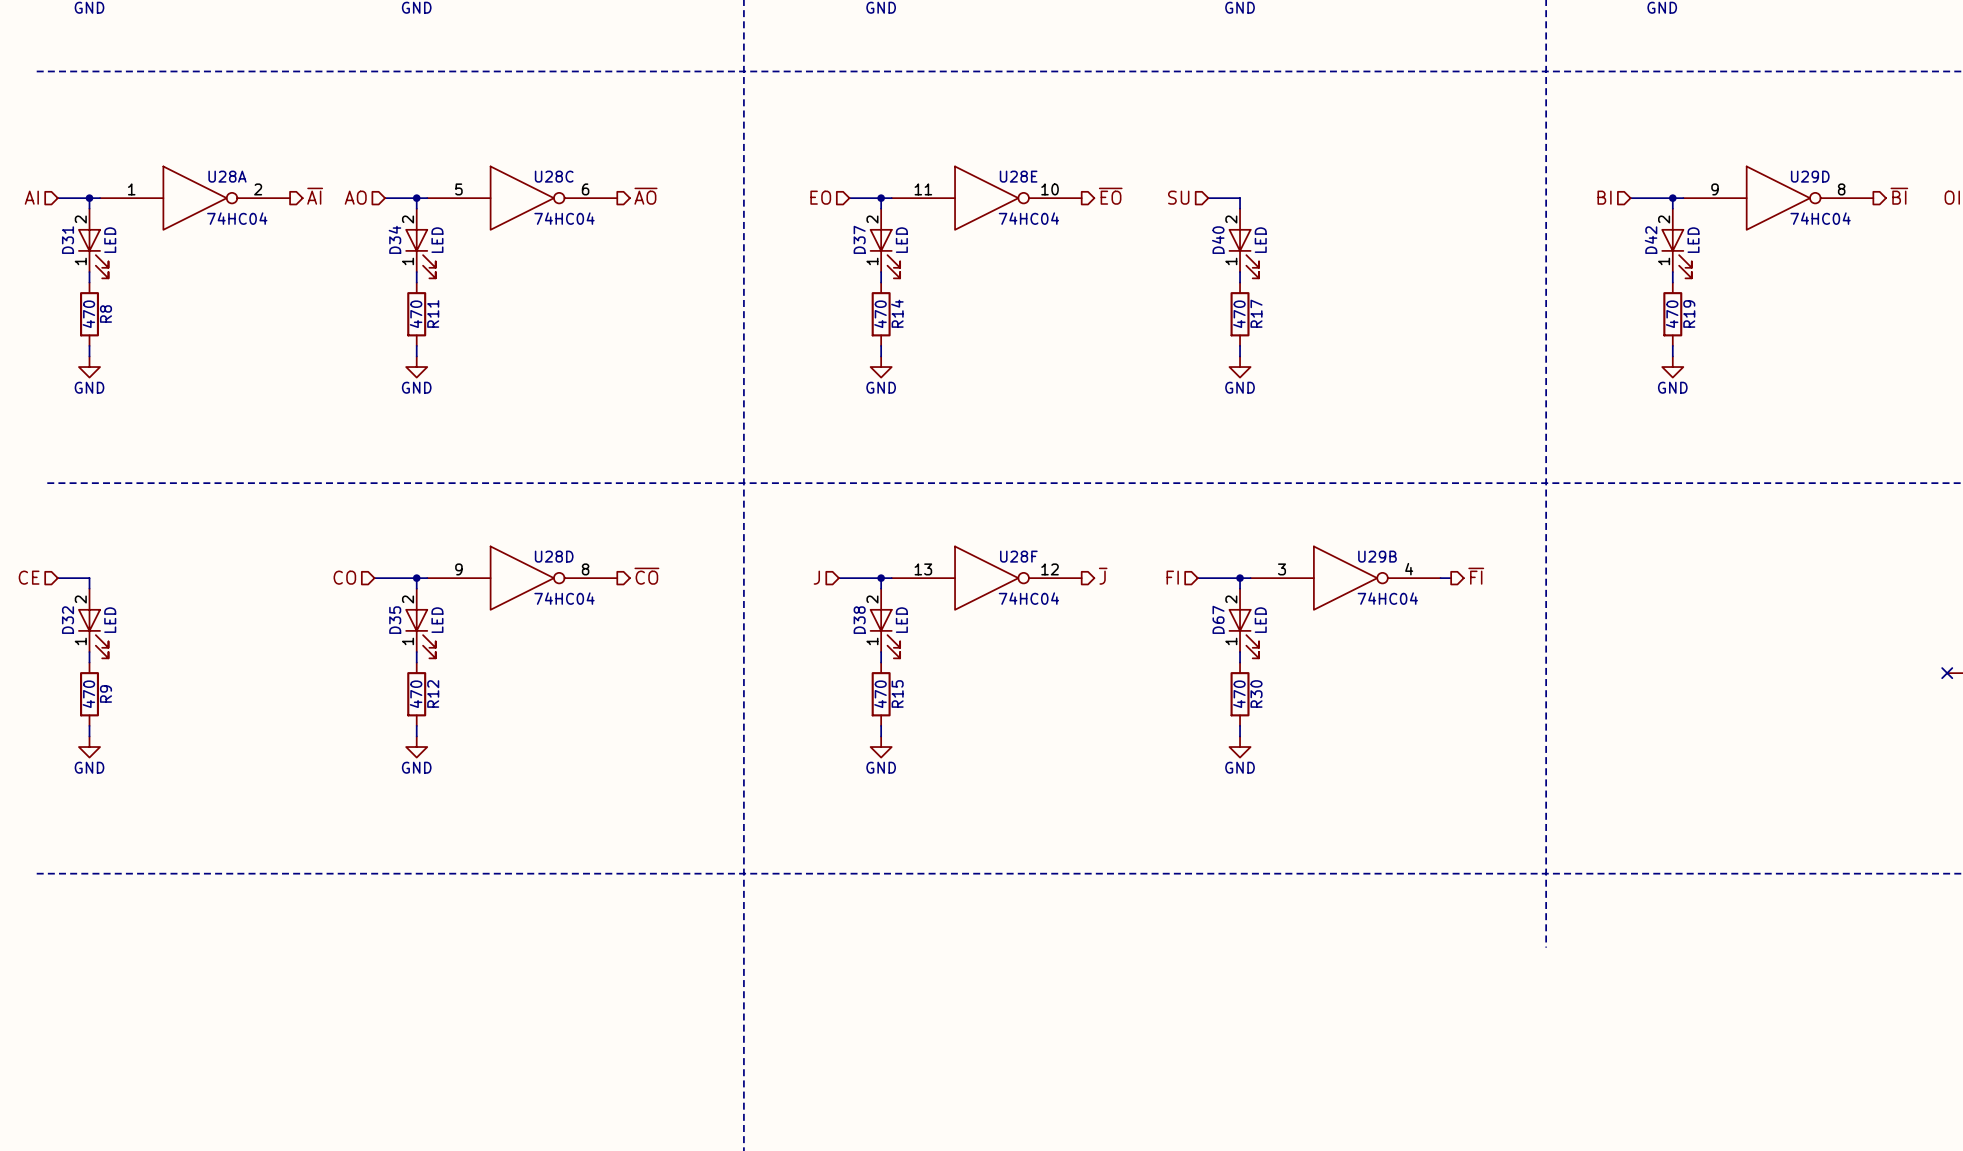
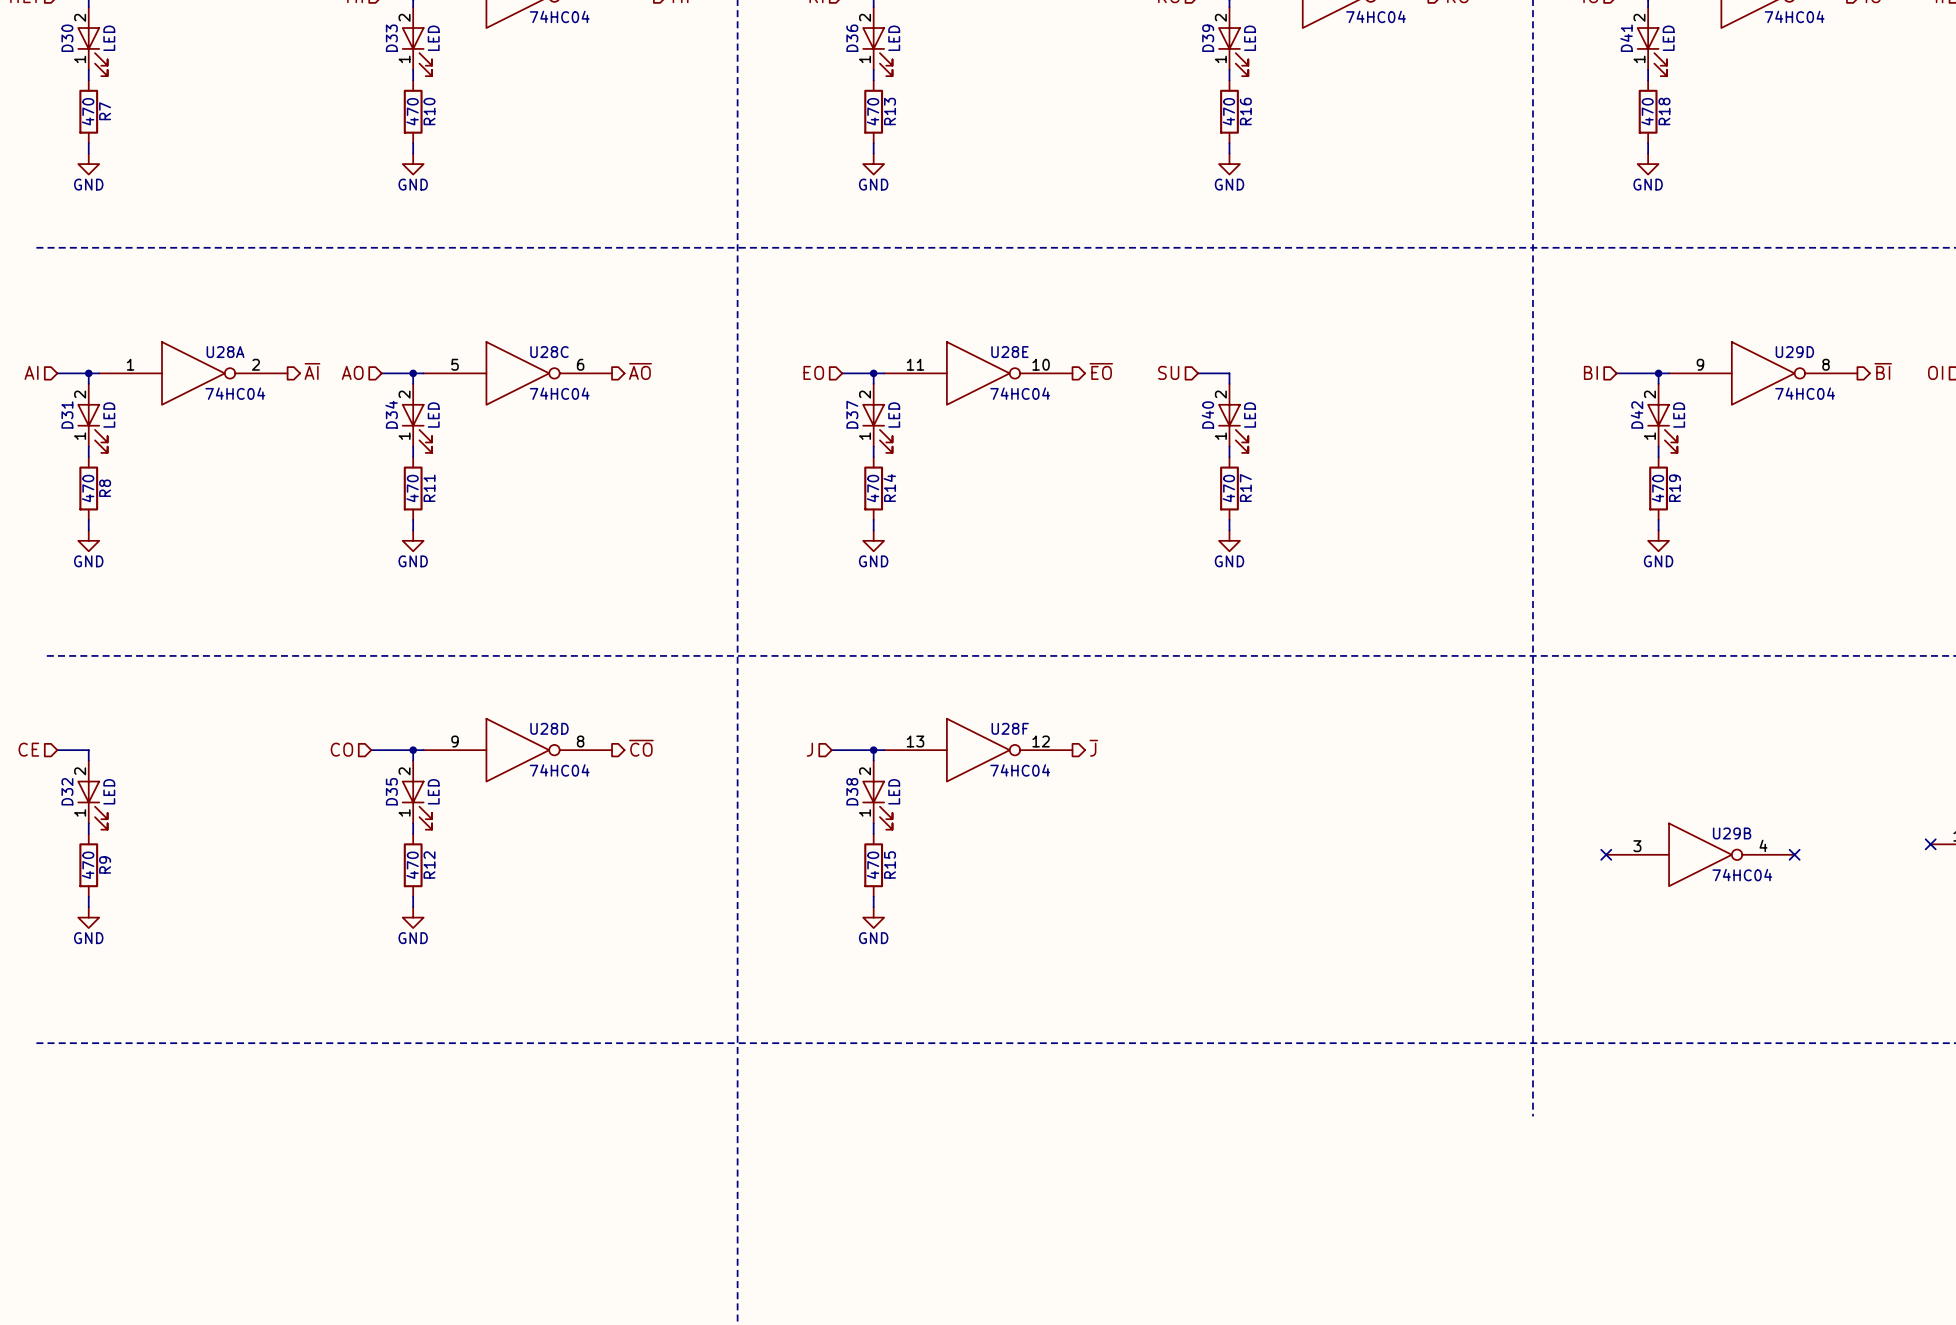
hierarchical label: ~{FI} (1476, 576) -> none
hierarchical label: FI (1172, 577) -> none
wire: (1197, 578) (1250, 578) -> none
wire: (1240, 578) (1240, 588) -> none
junction: (1240, 578) -> none
U29B position: (1345, 578) -> (1700, 854)
wire: (1440, 578) (1451, 578) -> none
D67: LED (1243, 623) -> none
wire: (1240, 652) (1240, 662) -> none
no-connect mark: none -> (1606, 854)
no-connect mark: none -> (1794, 854)
R30: 470 (1240, 694) -> none
wire: (1240, 725) (1240, 736) -> none
power symbol: GND (1240, 747) -> none

